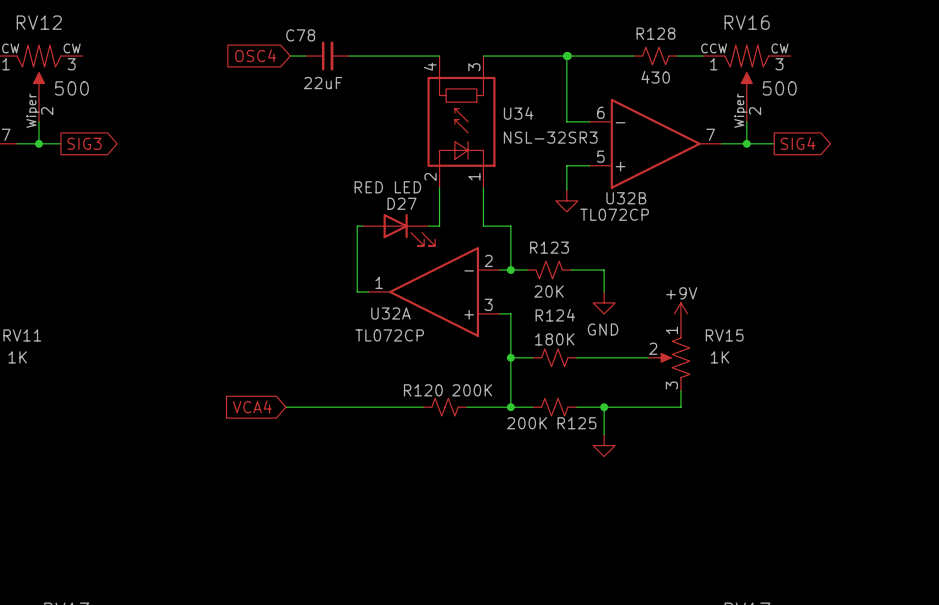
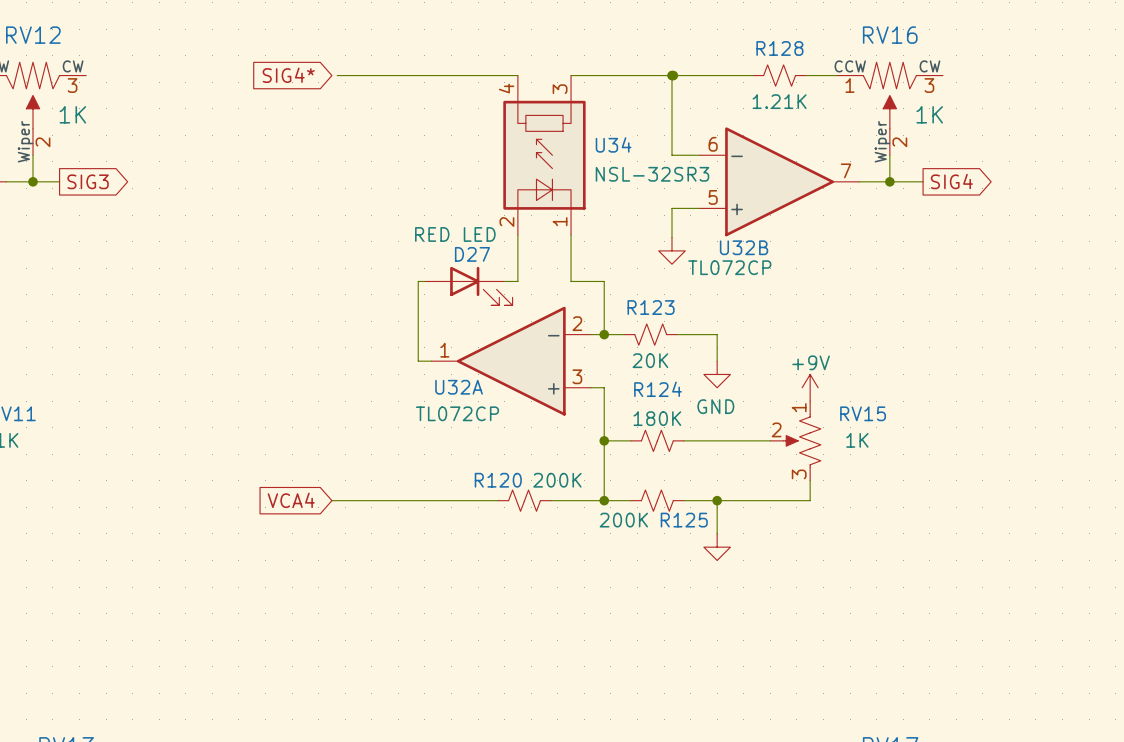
global label: OSC4 (255, 55) -> SIG4* (288, 75)
C78: 22uF (327, 56) -> none
R128 value: 430 (655, 77) -> 1.21K (779, 101)
RV12 value: 500 (71, 88) -> 1K (72, 114)
RV16 value: 500 (779, 88) -> 1K (929, 114)

